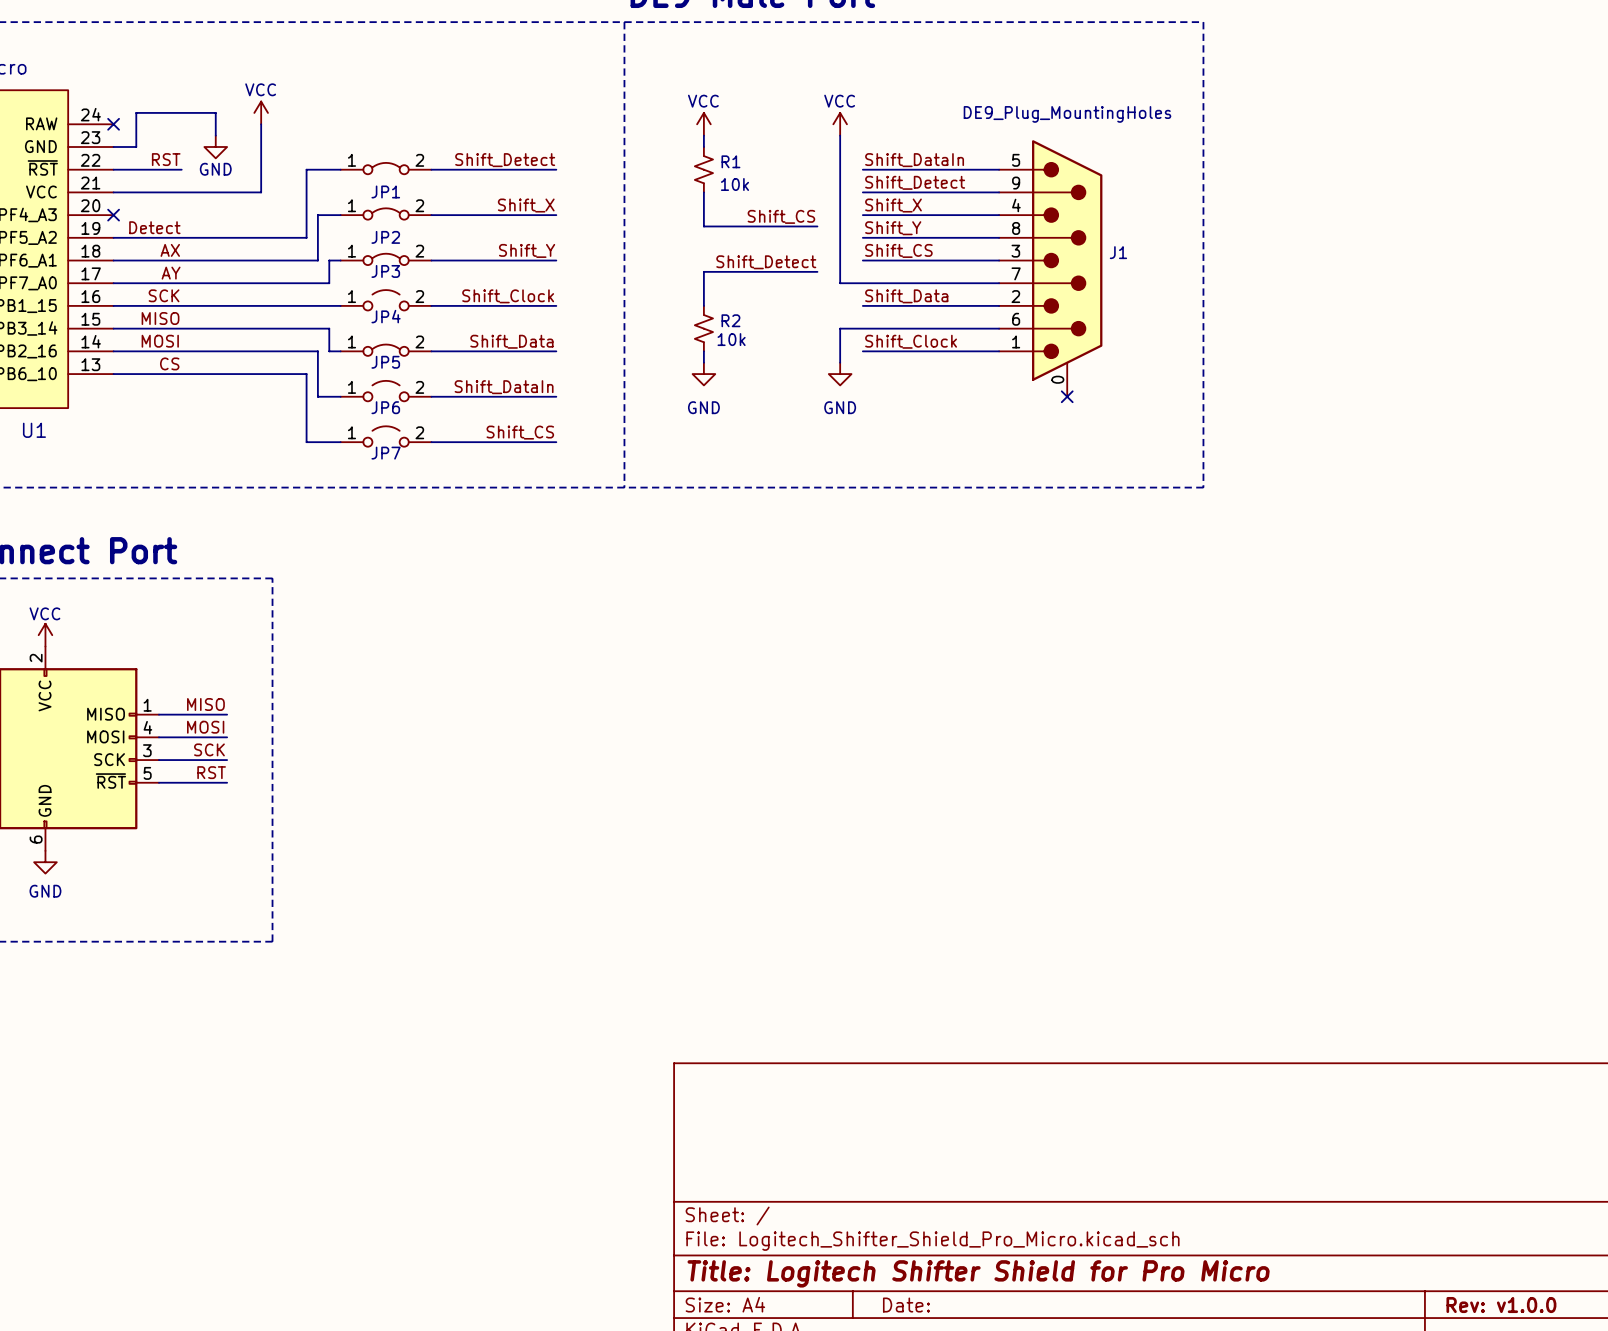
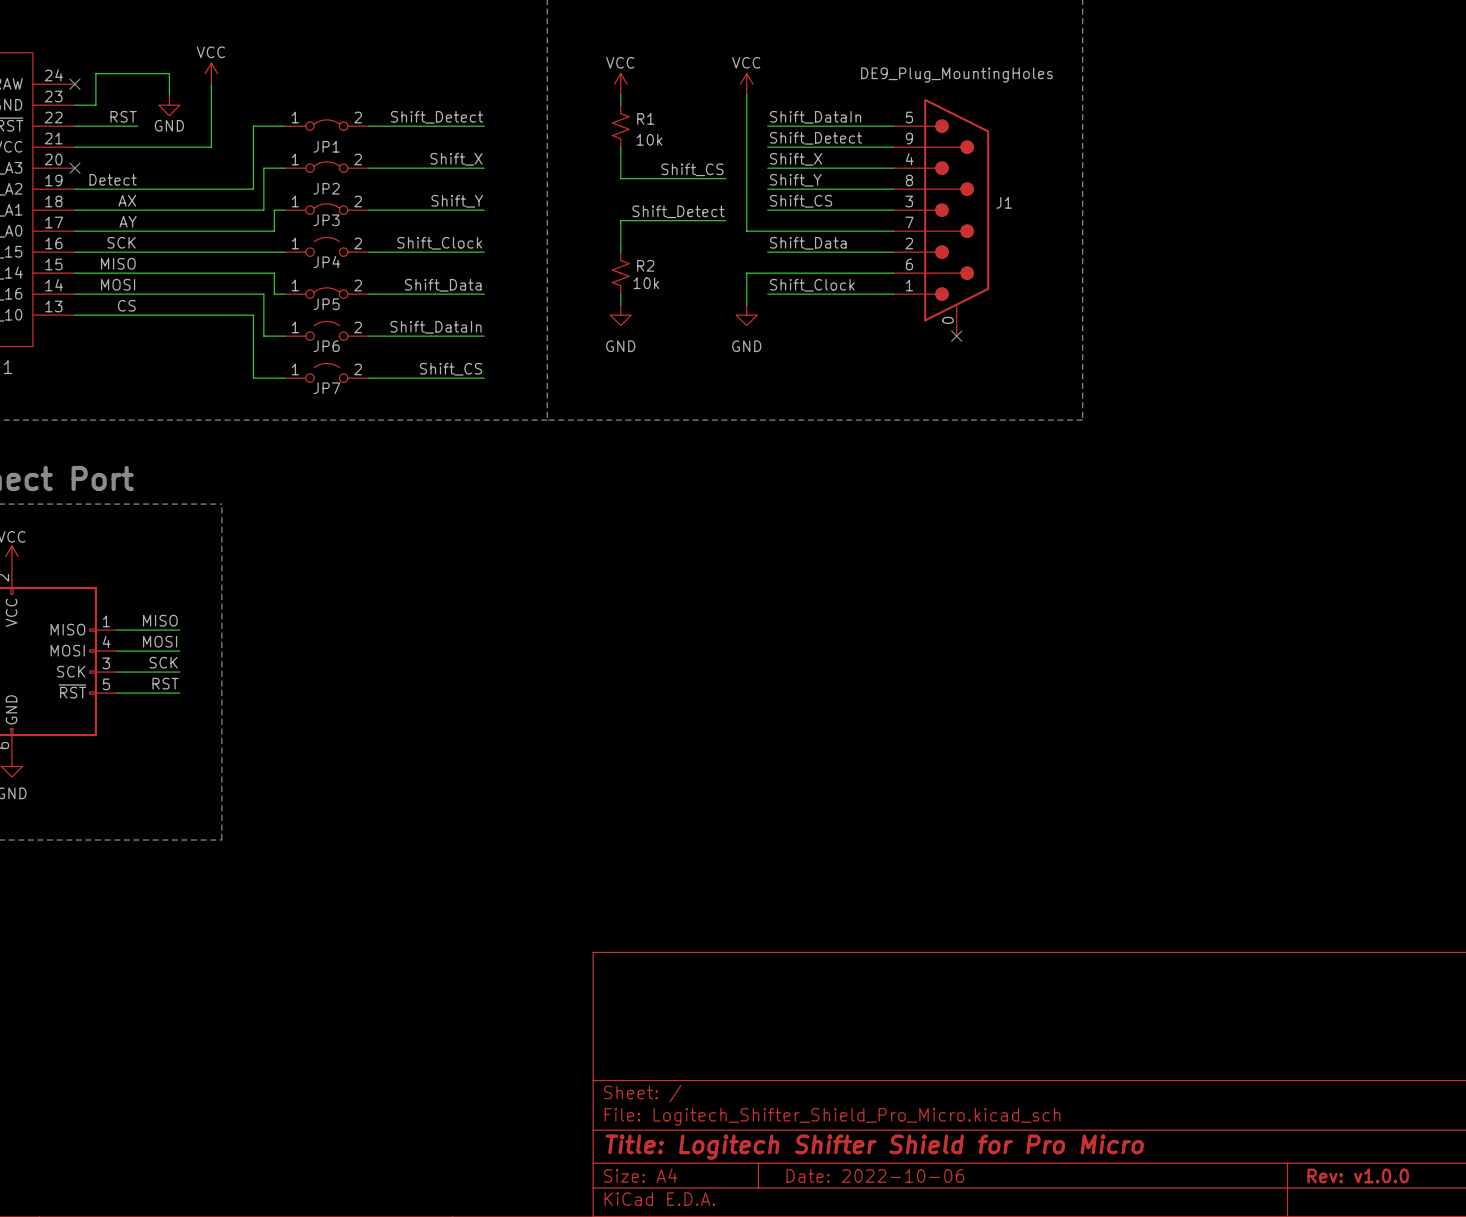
title block: Date: (906, 1305) -> Date: 2022-10-06 (875, 1175)

